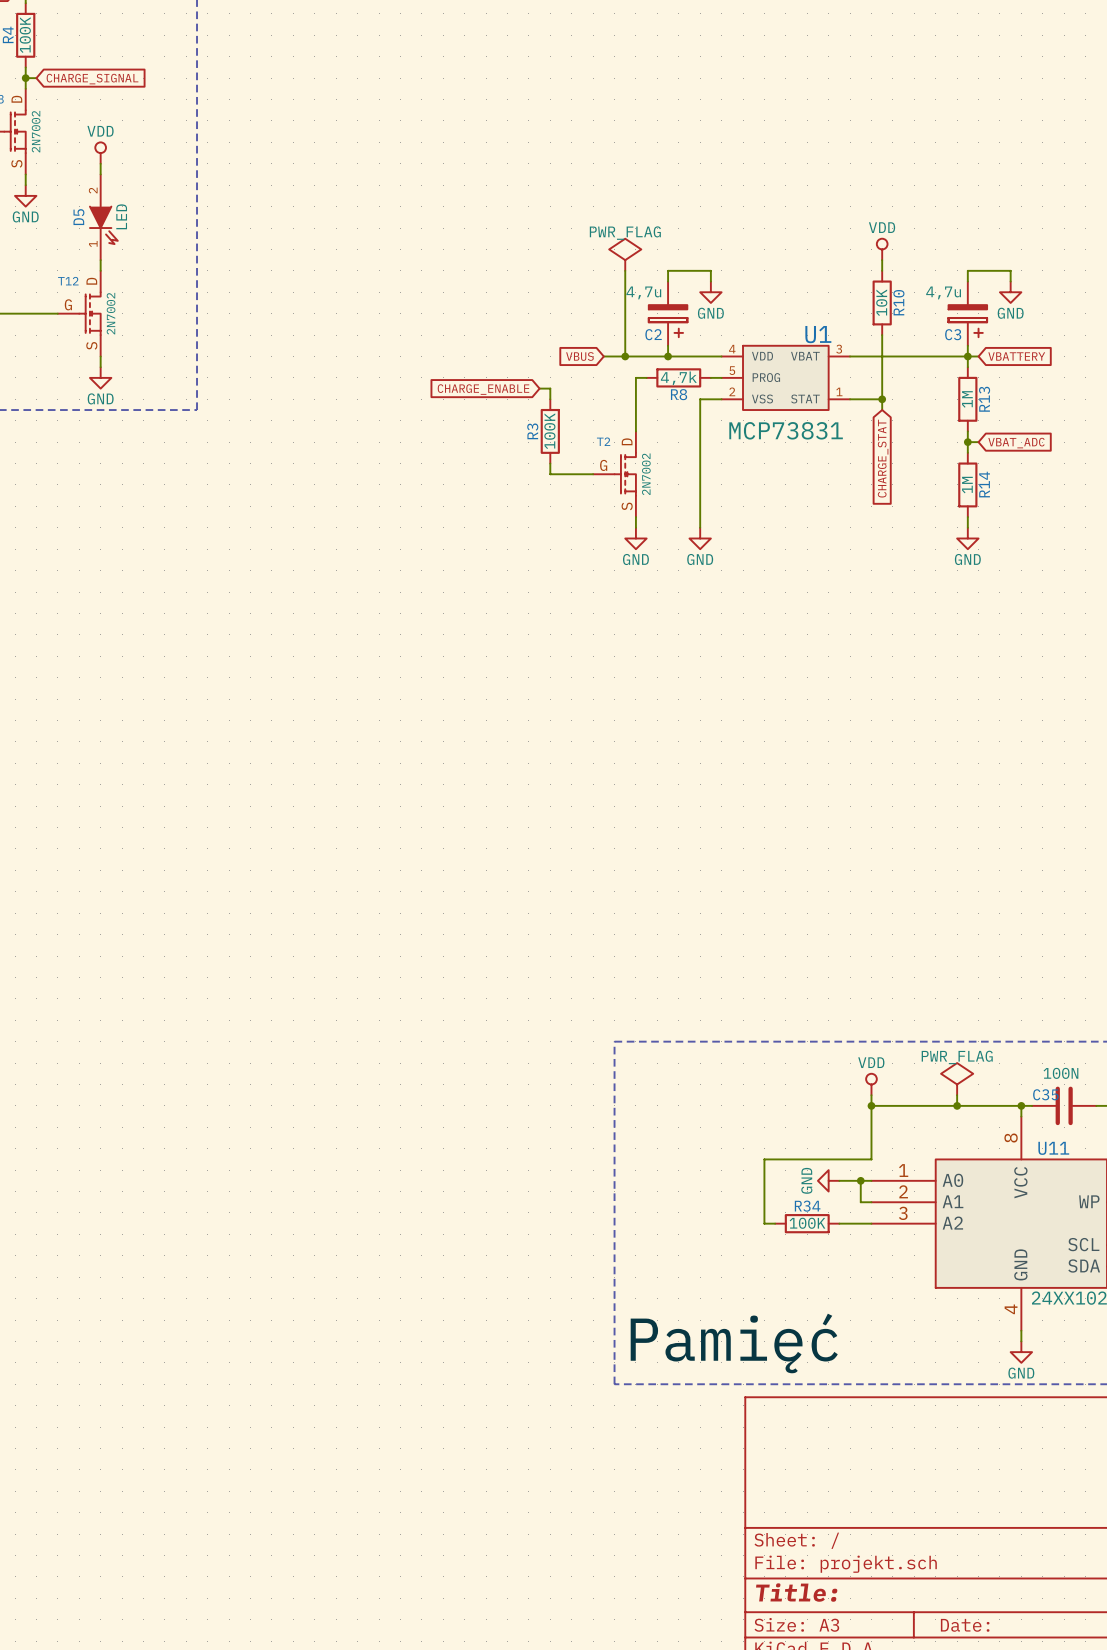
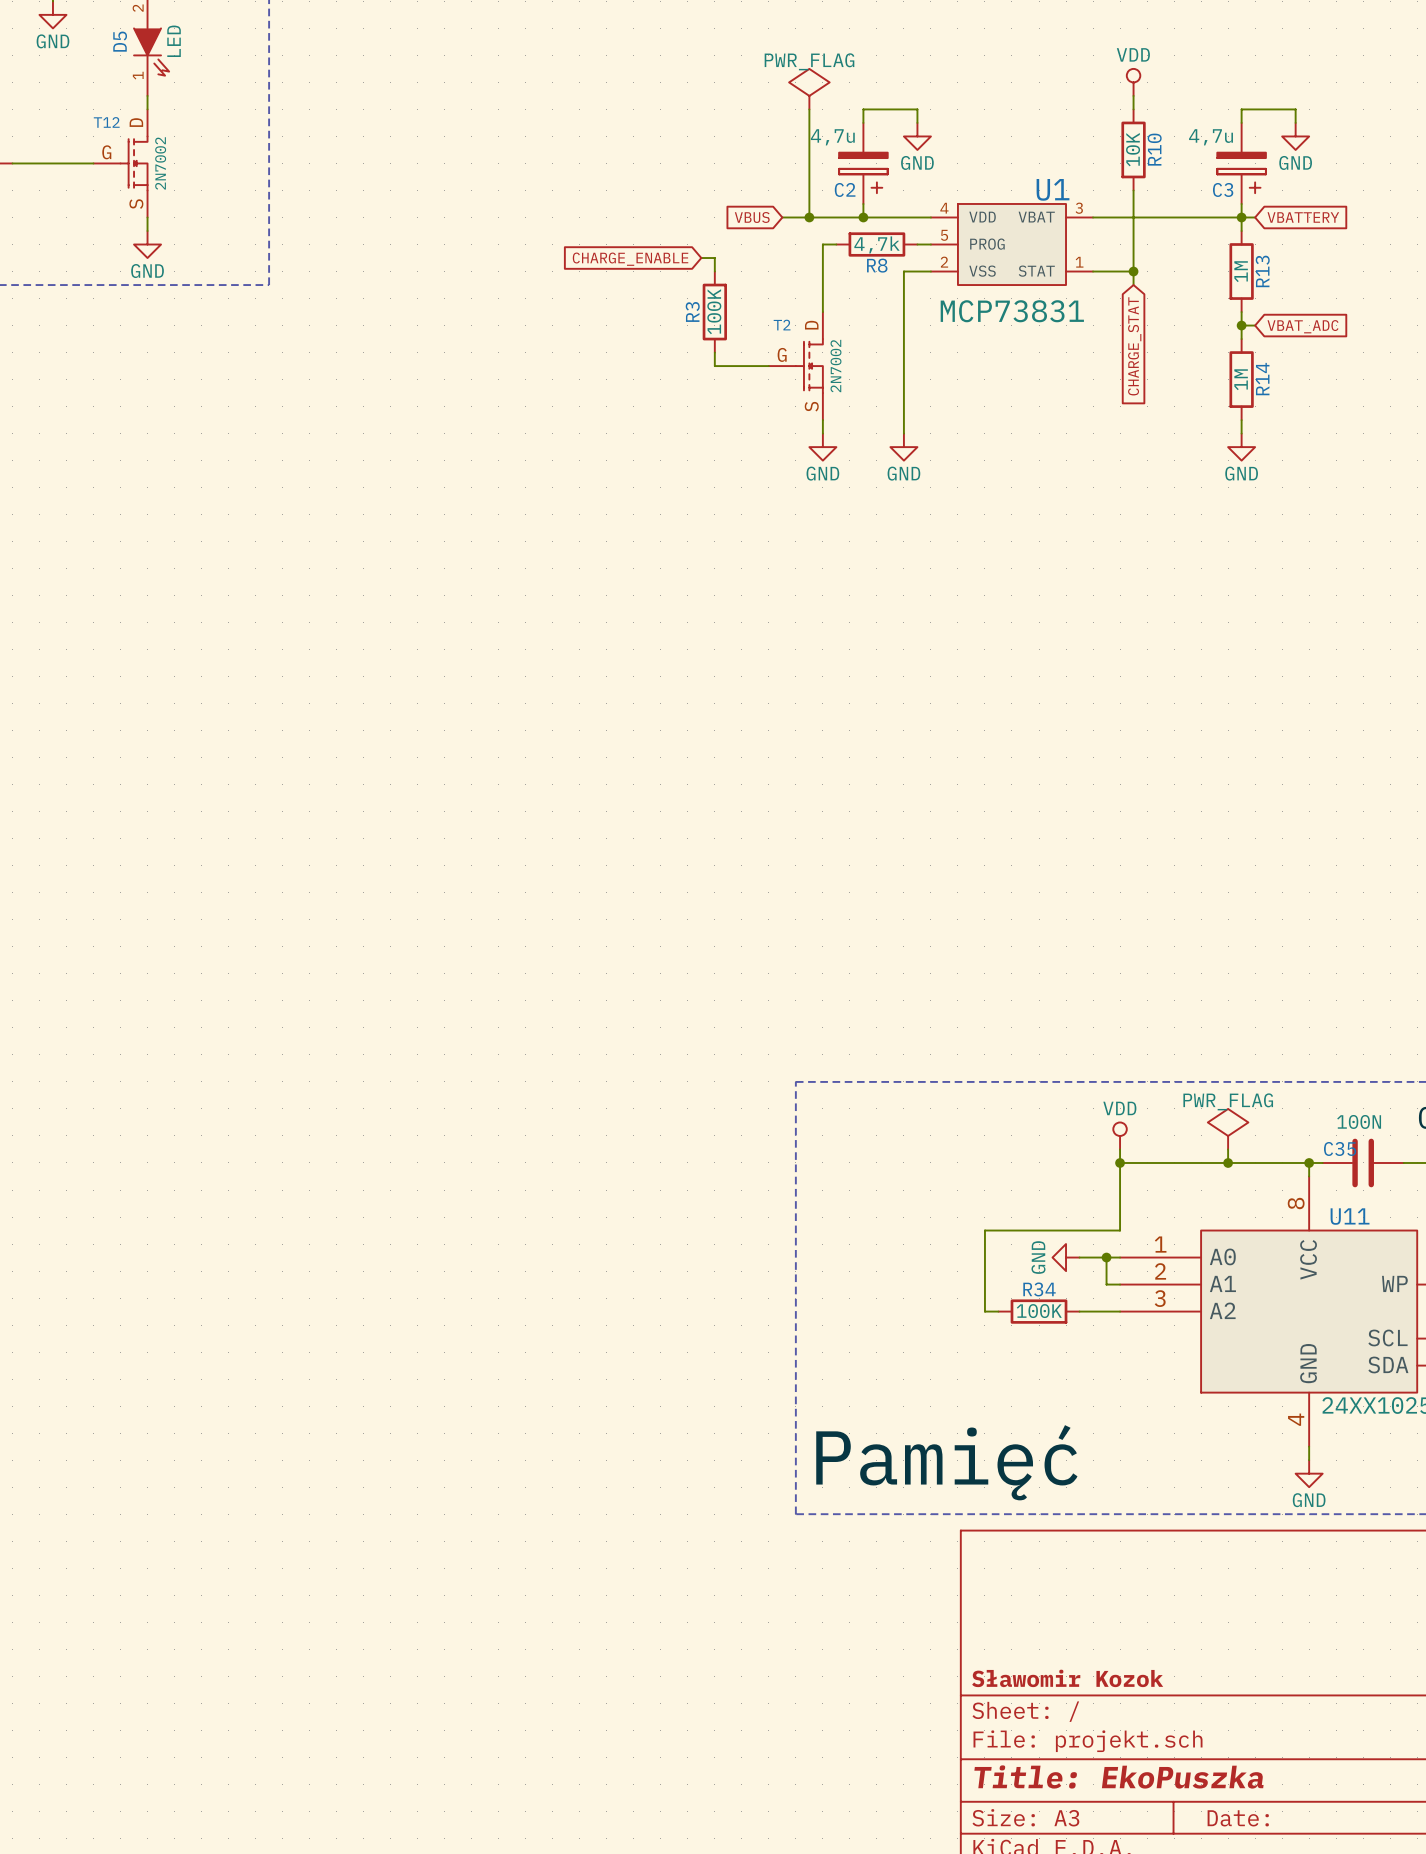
title block: none -> Sławomir Kozok (1067, 1678)
title block: Title: (796, 1592) -> Title: EkoPuszka (1118, 1776)

